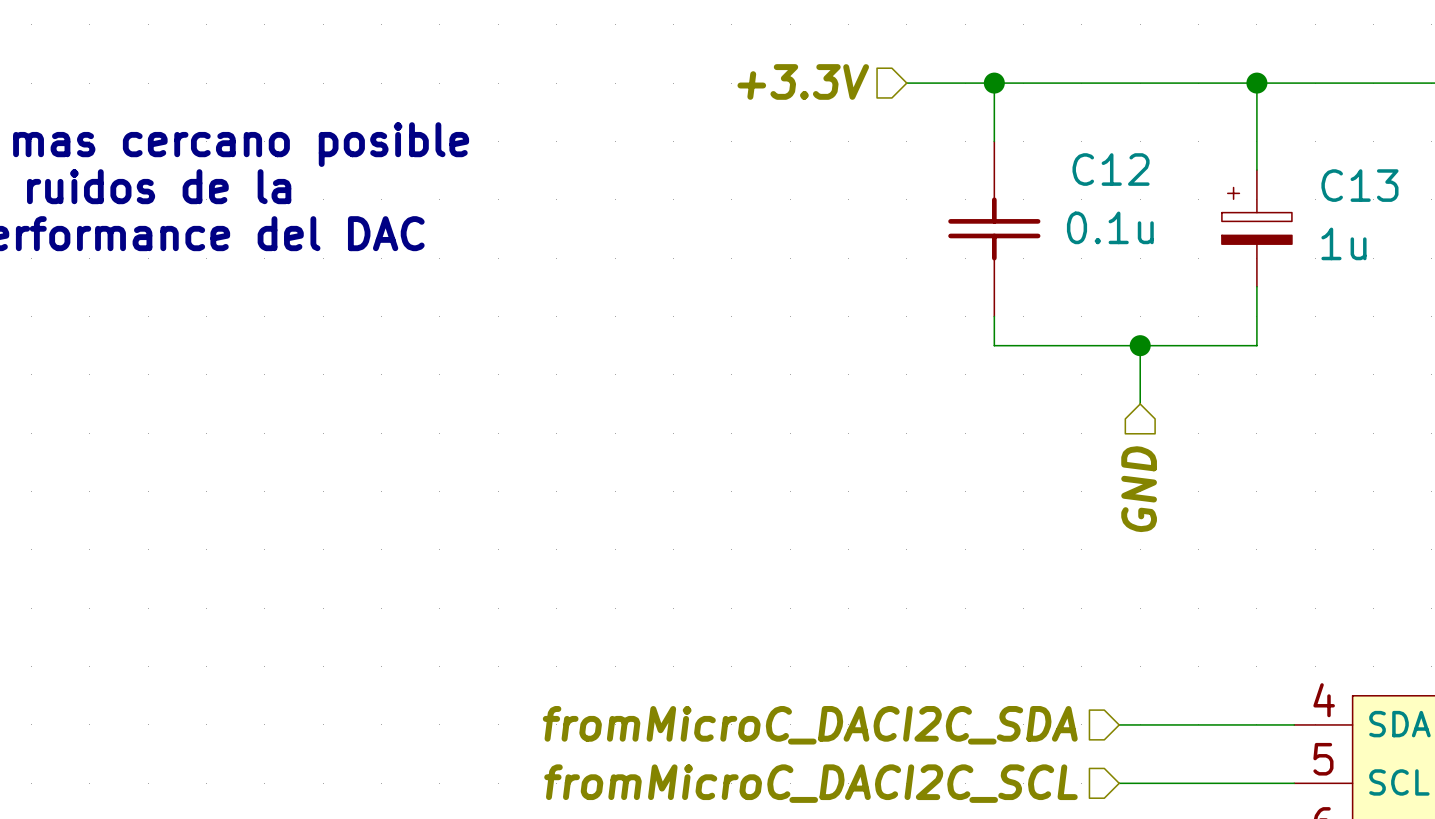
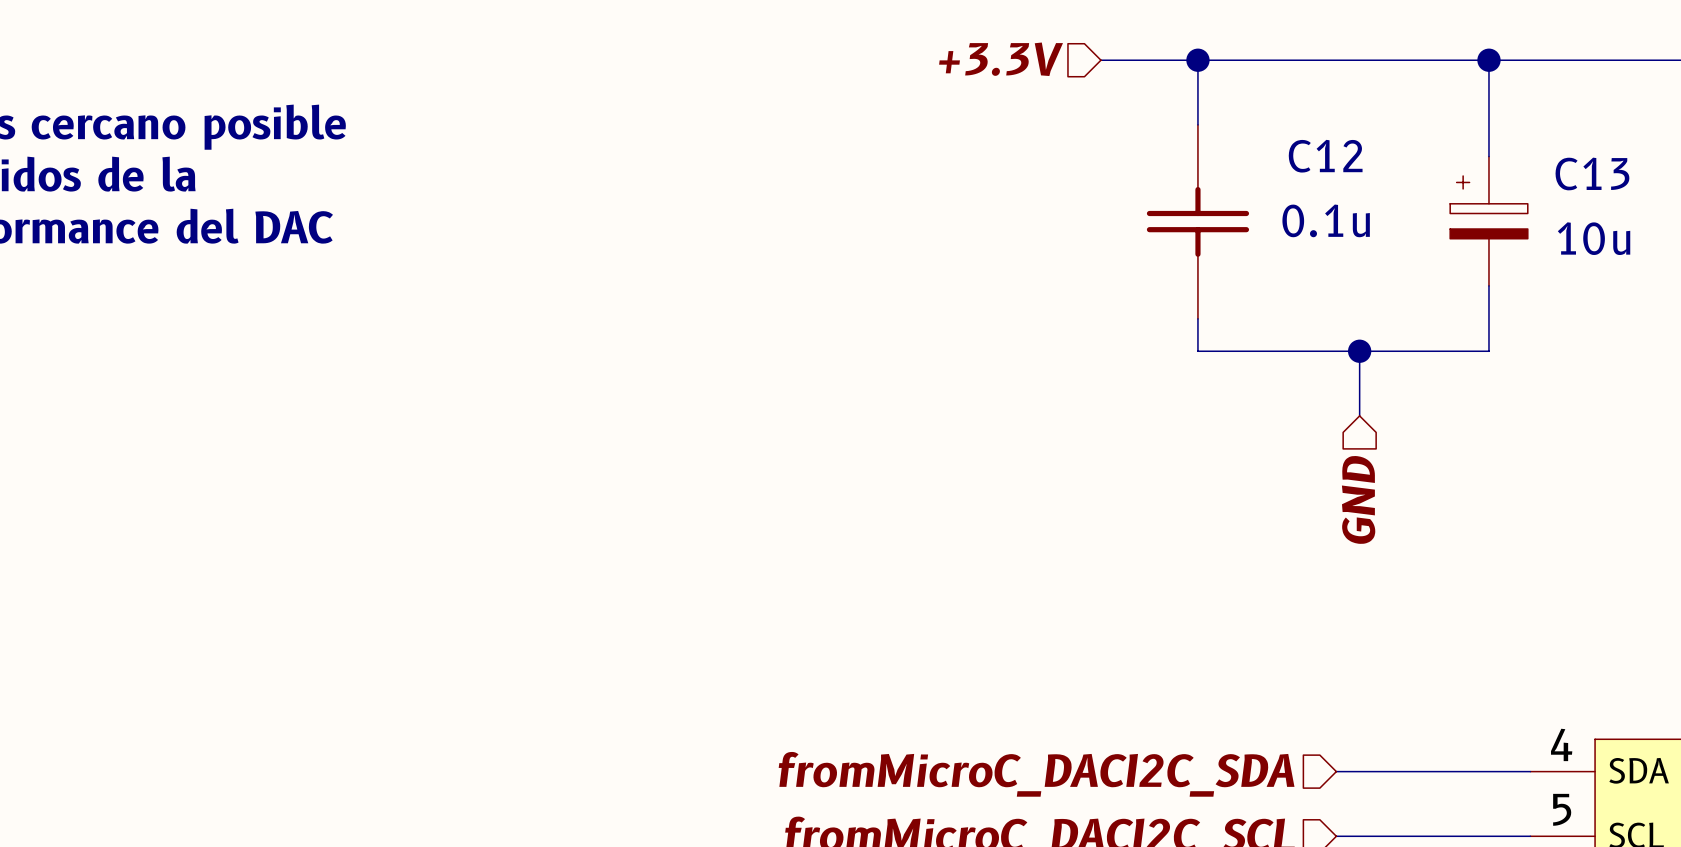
C13 value: 1u (1343, 243) -> 10u (1594, 238)

